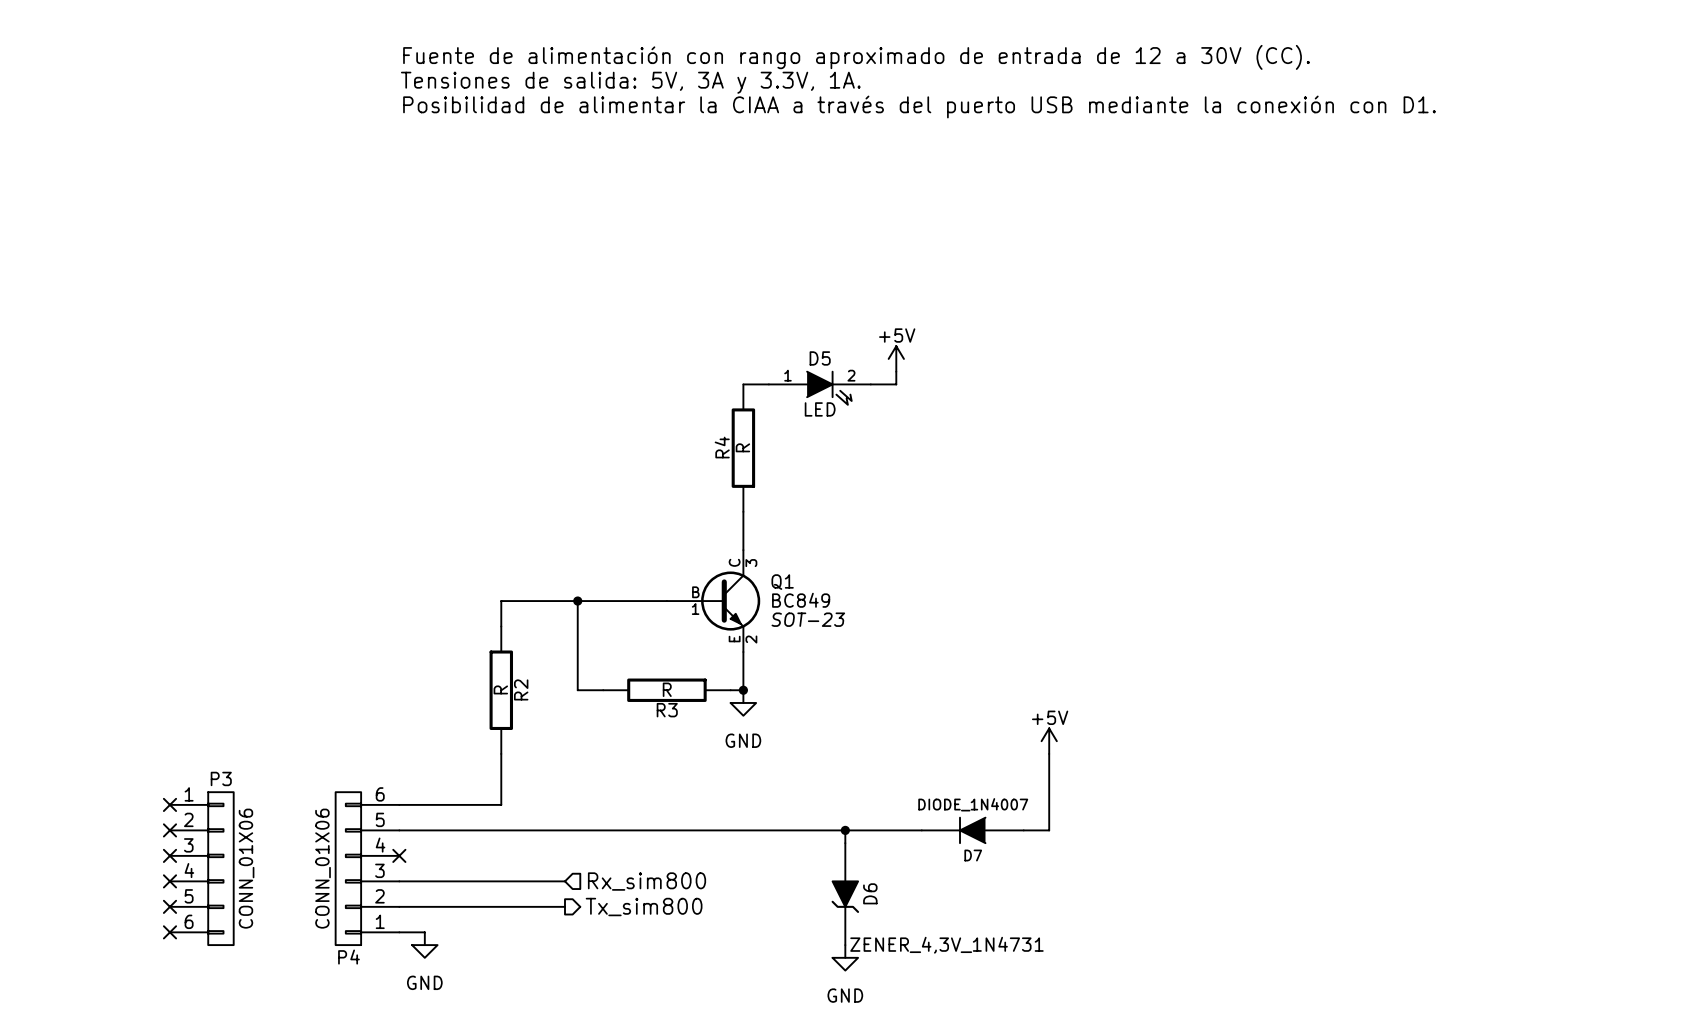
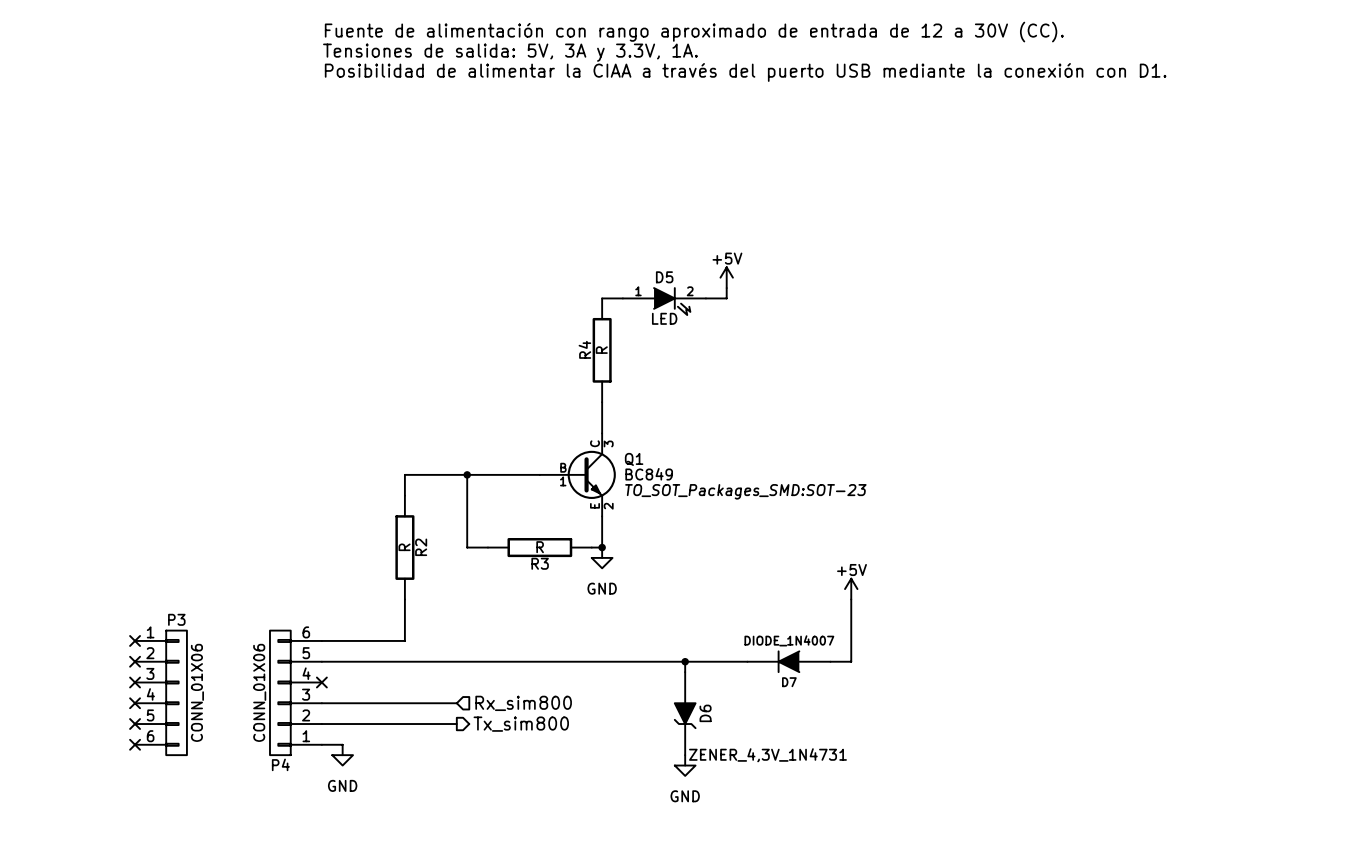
Q1 text: SOT-23 (808, 619) -> TO_SOT_Packages_SMD:SOT-23 (745, 491)

